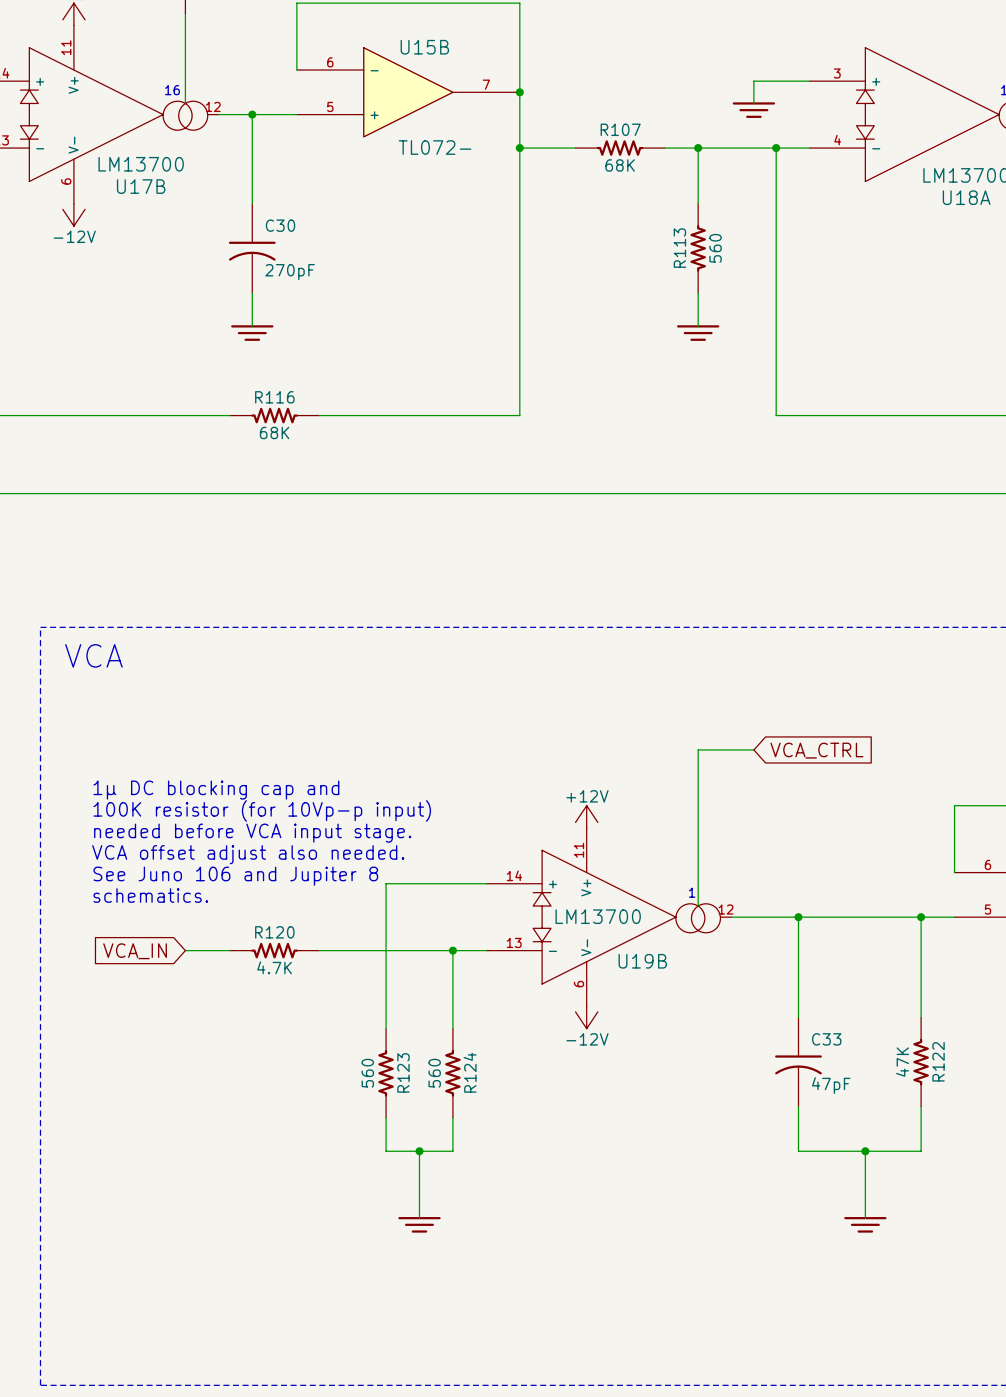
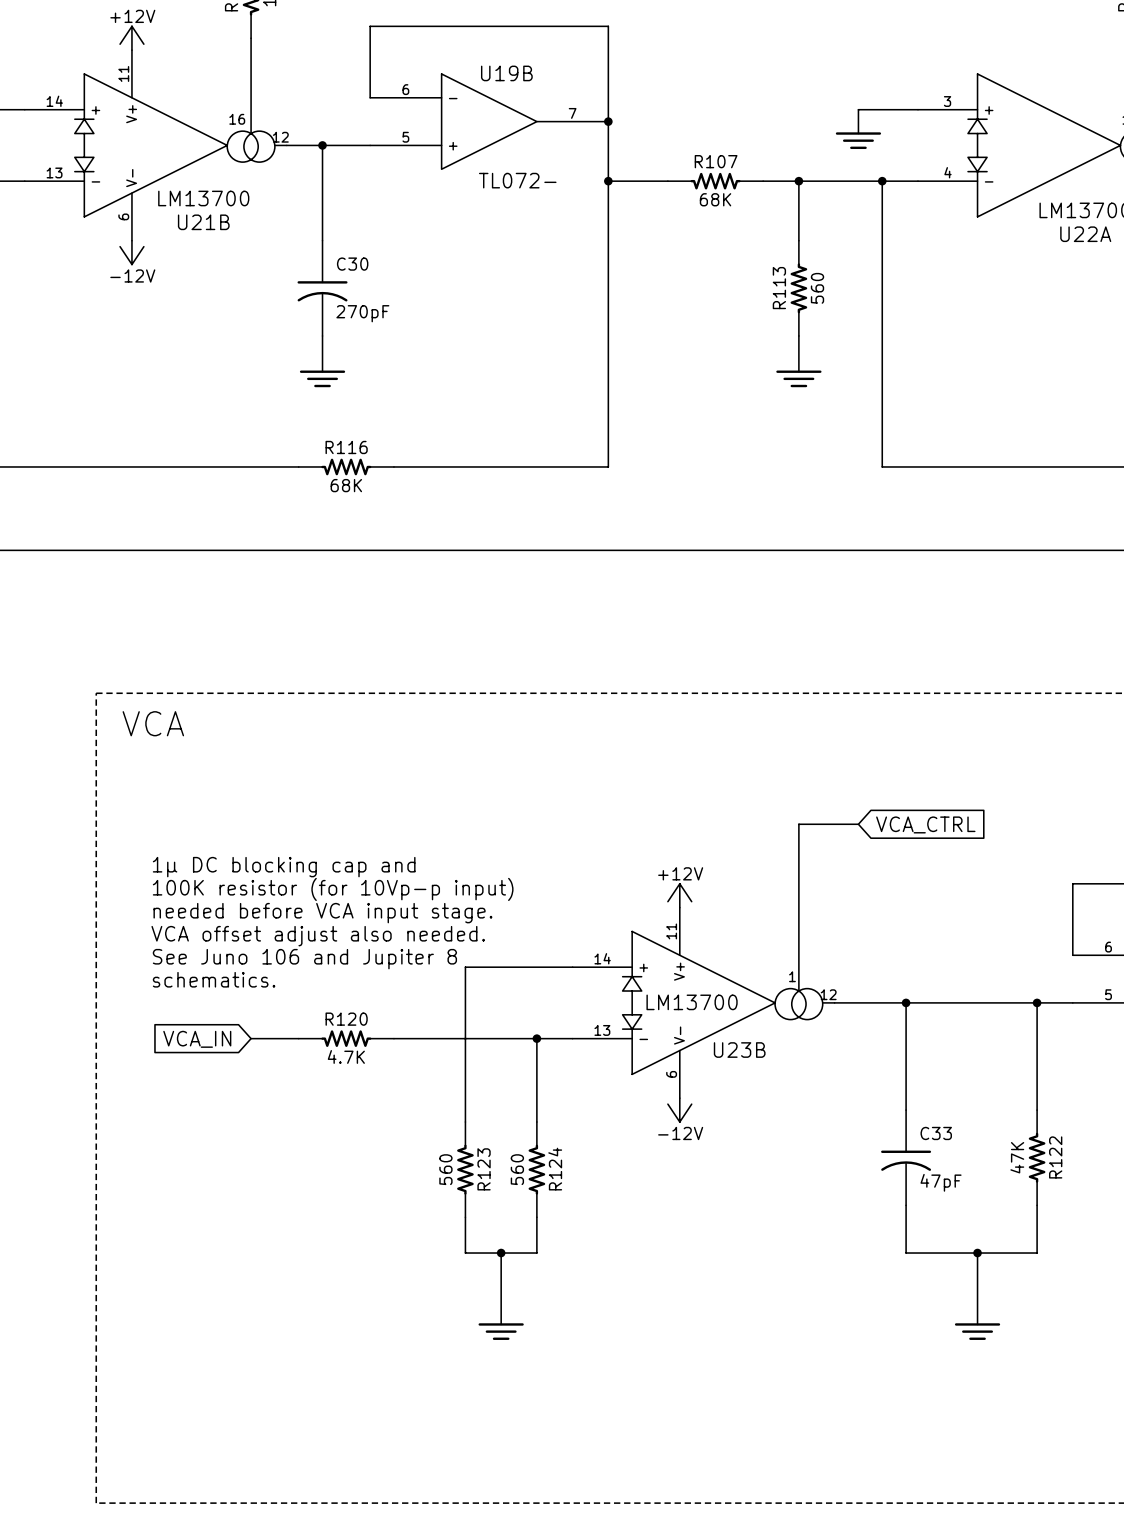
U15B name: U15B (424, 47) -> U19B (506, 73)
U17B name: U17B (141, 186) -> U21B (203, 222)
U18A name: U18A (966, 197) -> U22A (1085, 234)
U19B name: U19B (642, 961) -> U23B (739, 1050)

